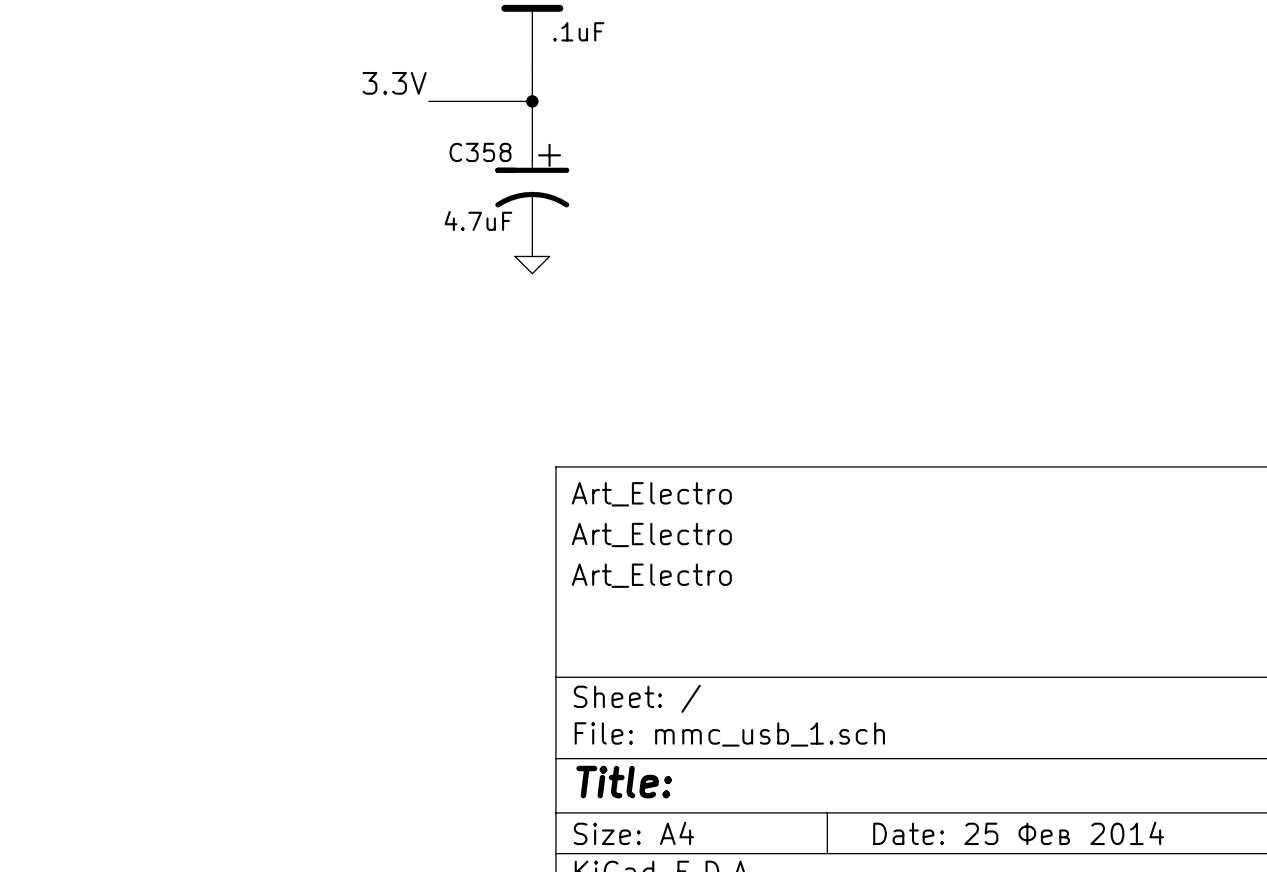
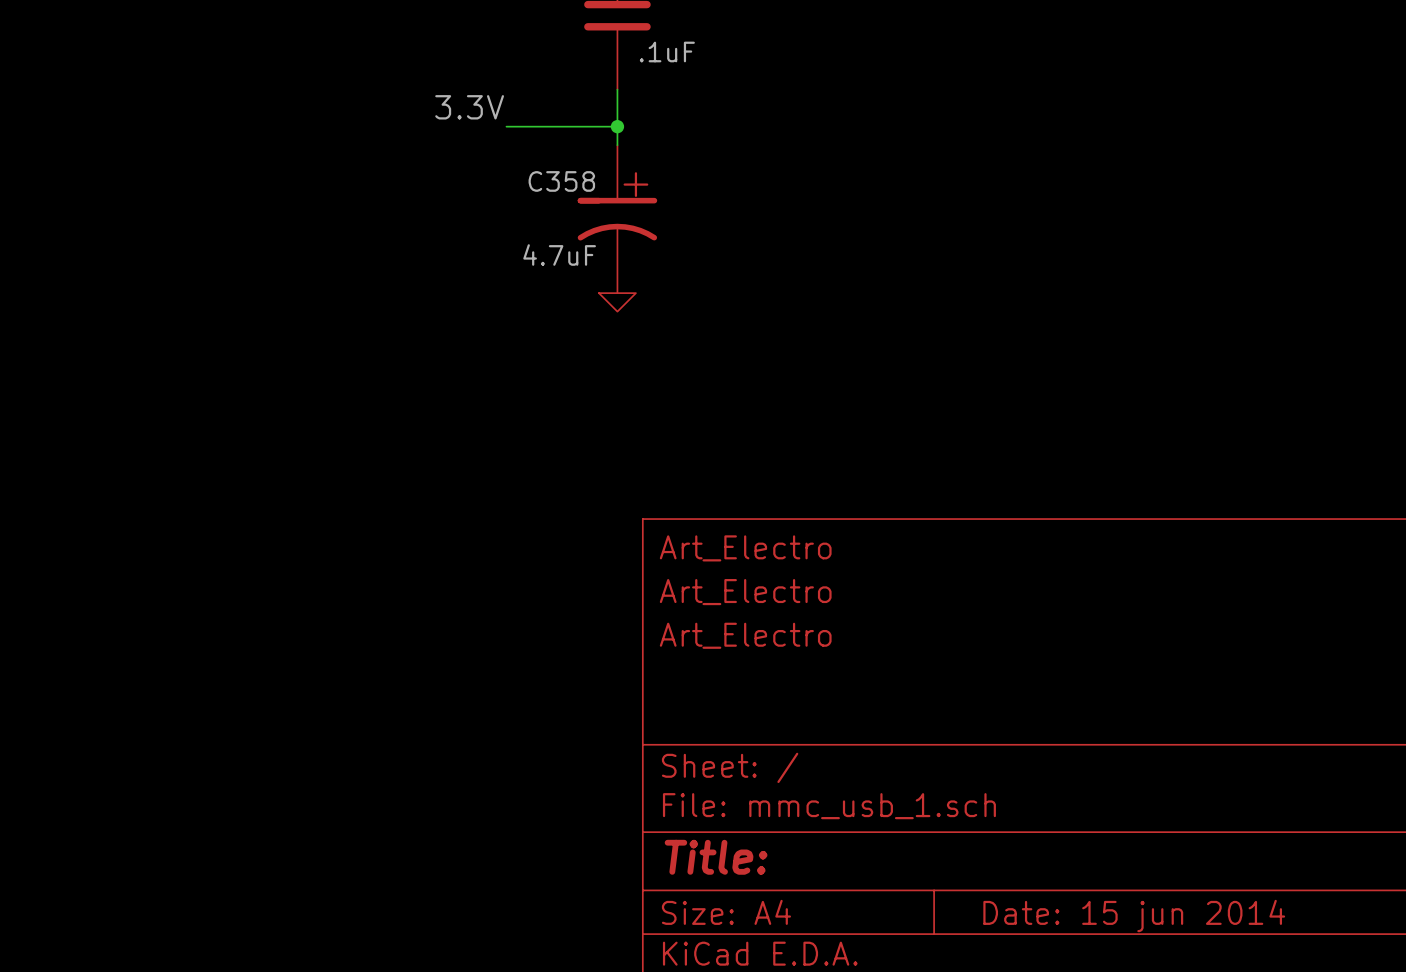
title block: Date: 25 Фев 2014 (1018, 833) -> Date: 15 jun 2014 (1134, 916)

